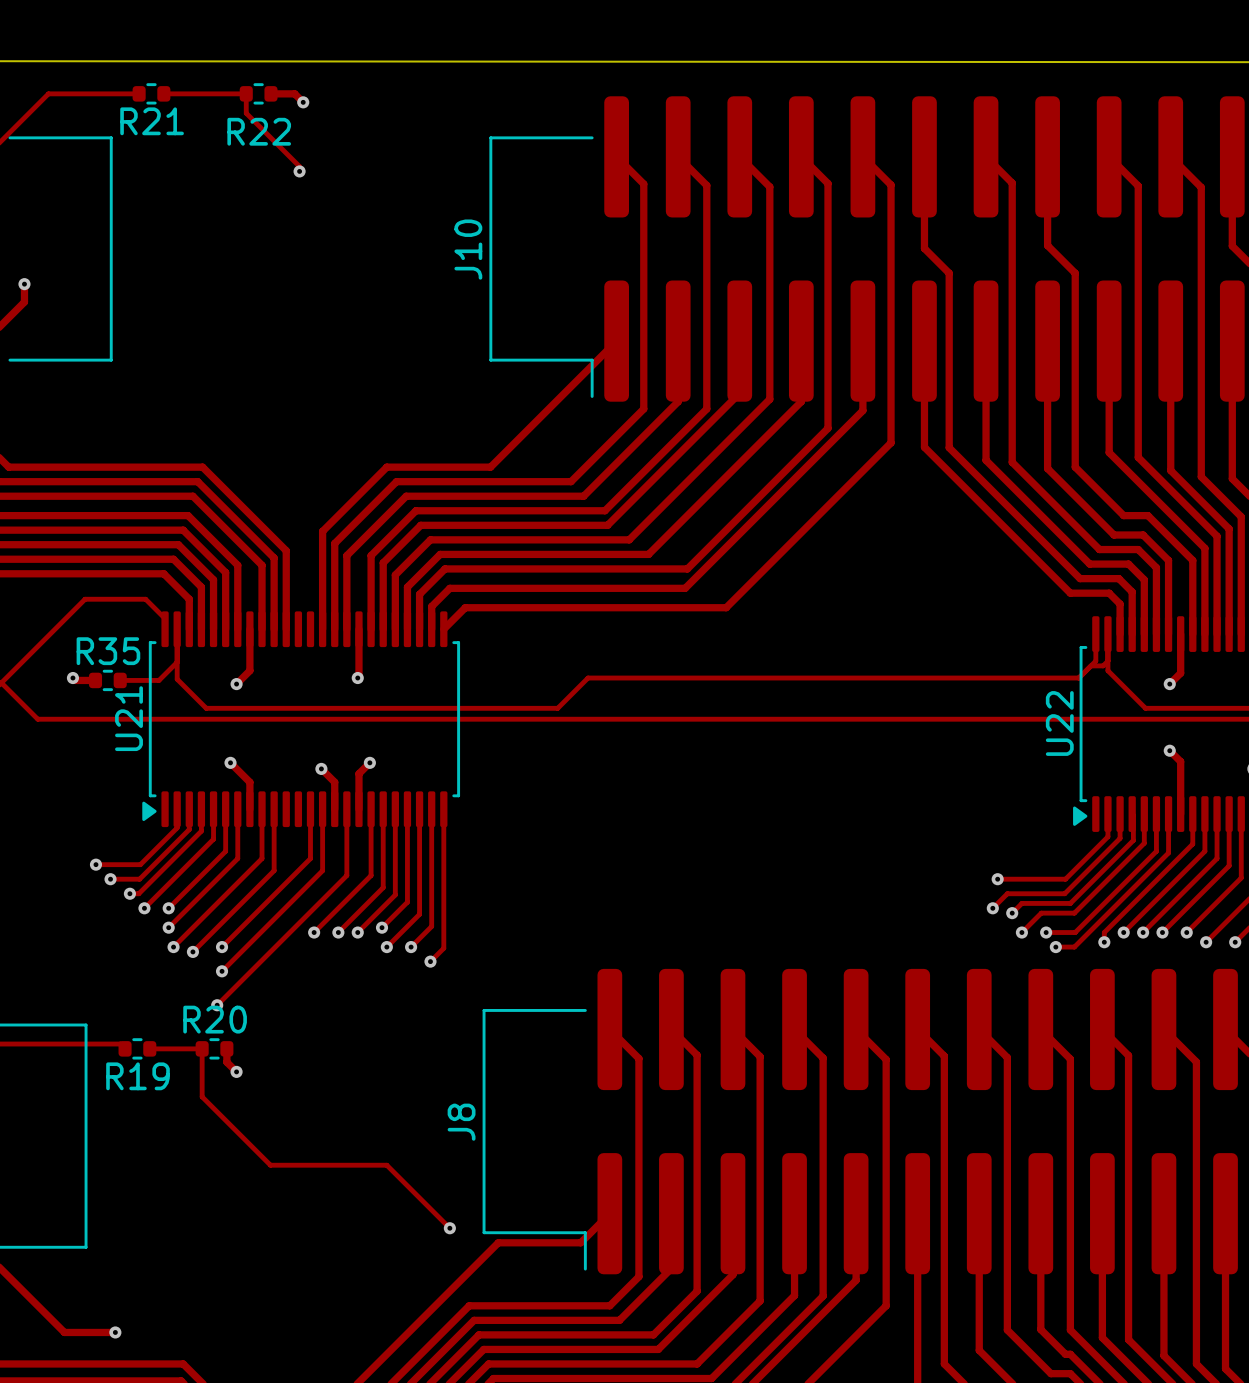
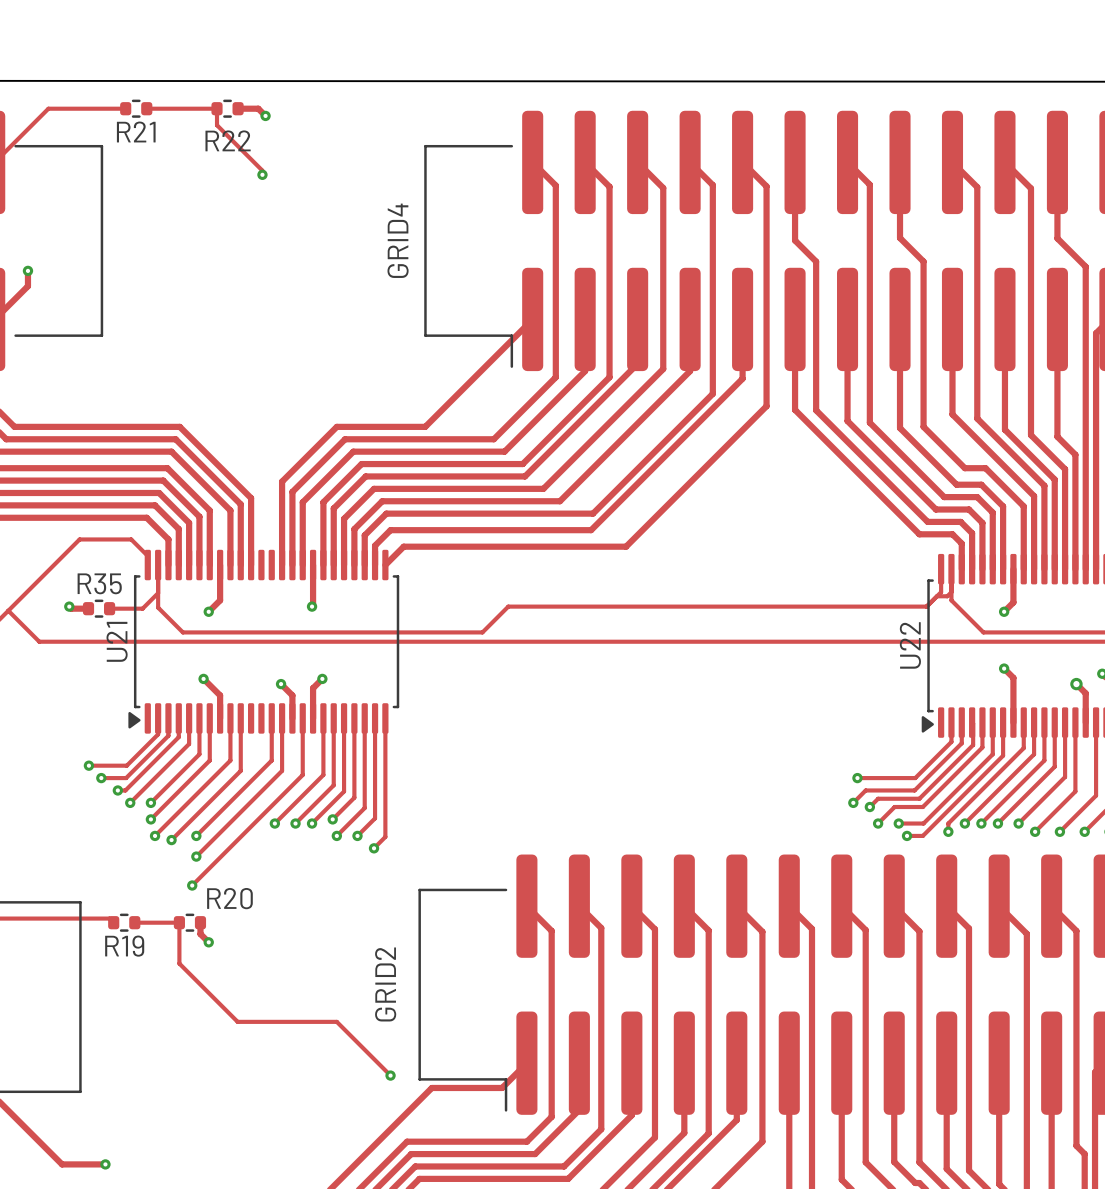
J10 name: J10 (468, 249) -> GRID4 (398, 240)
R20 name position: R20 (215, 1019) -> R20 (229, 898)
J8 name: J8 (461, 1122) -> GRID2 (385, 984)

